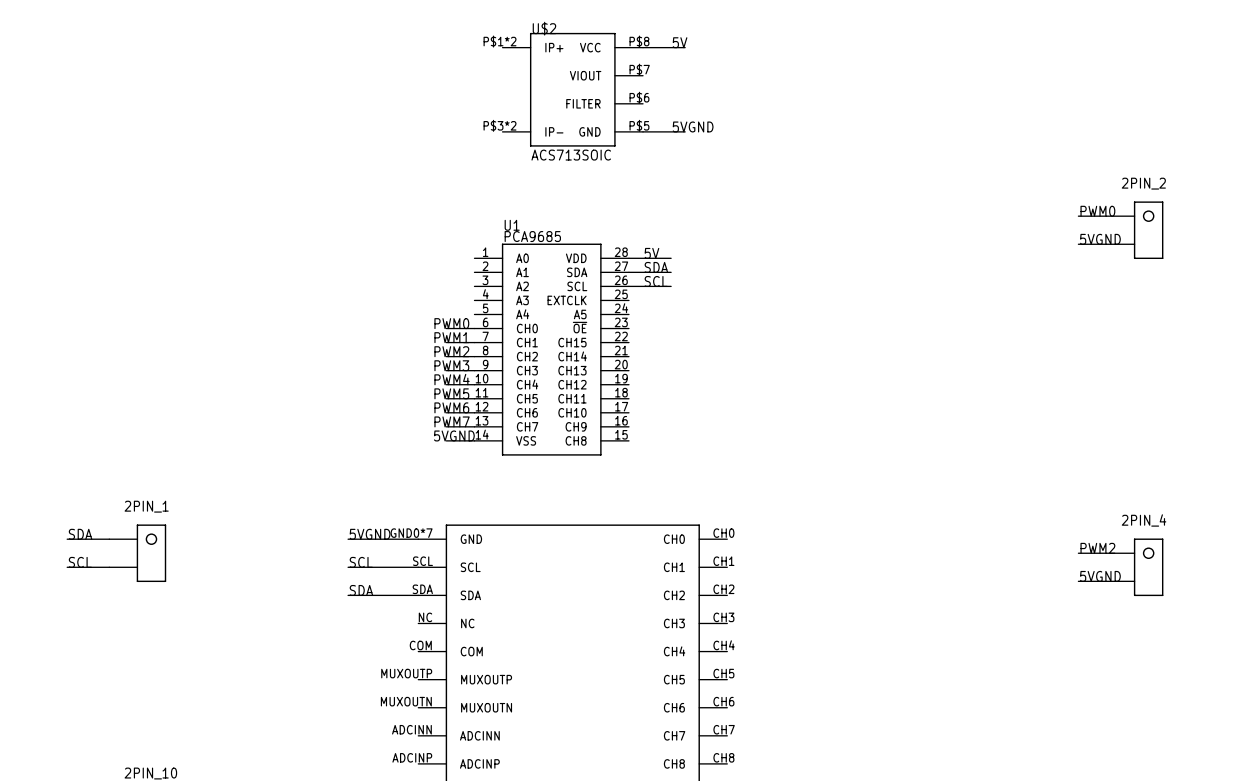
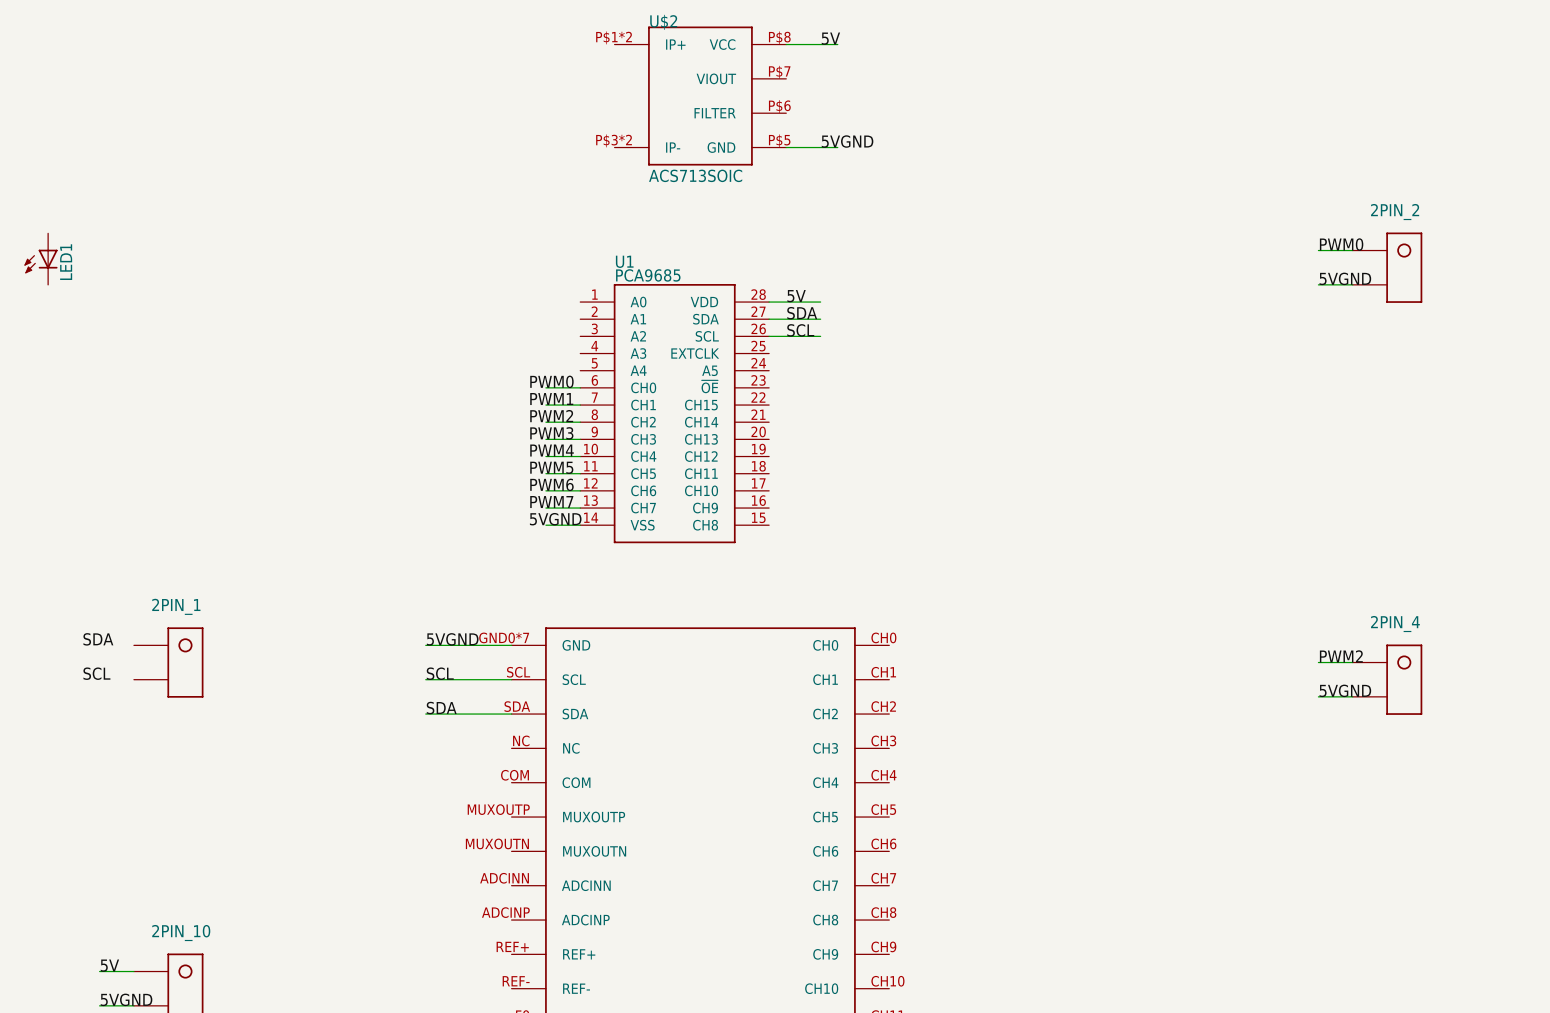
LED1: none -> (40, 259)
wire: (67, 539) (109, 539) -> none
wire: (67, 567) (109, 567) -> none

